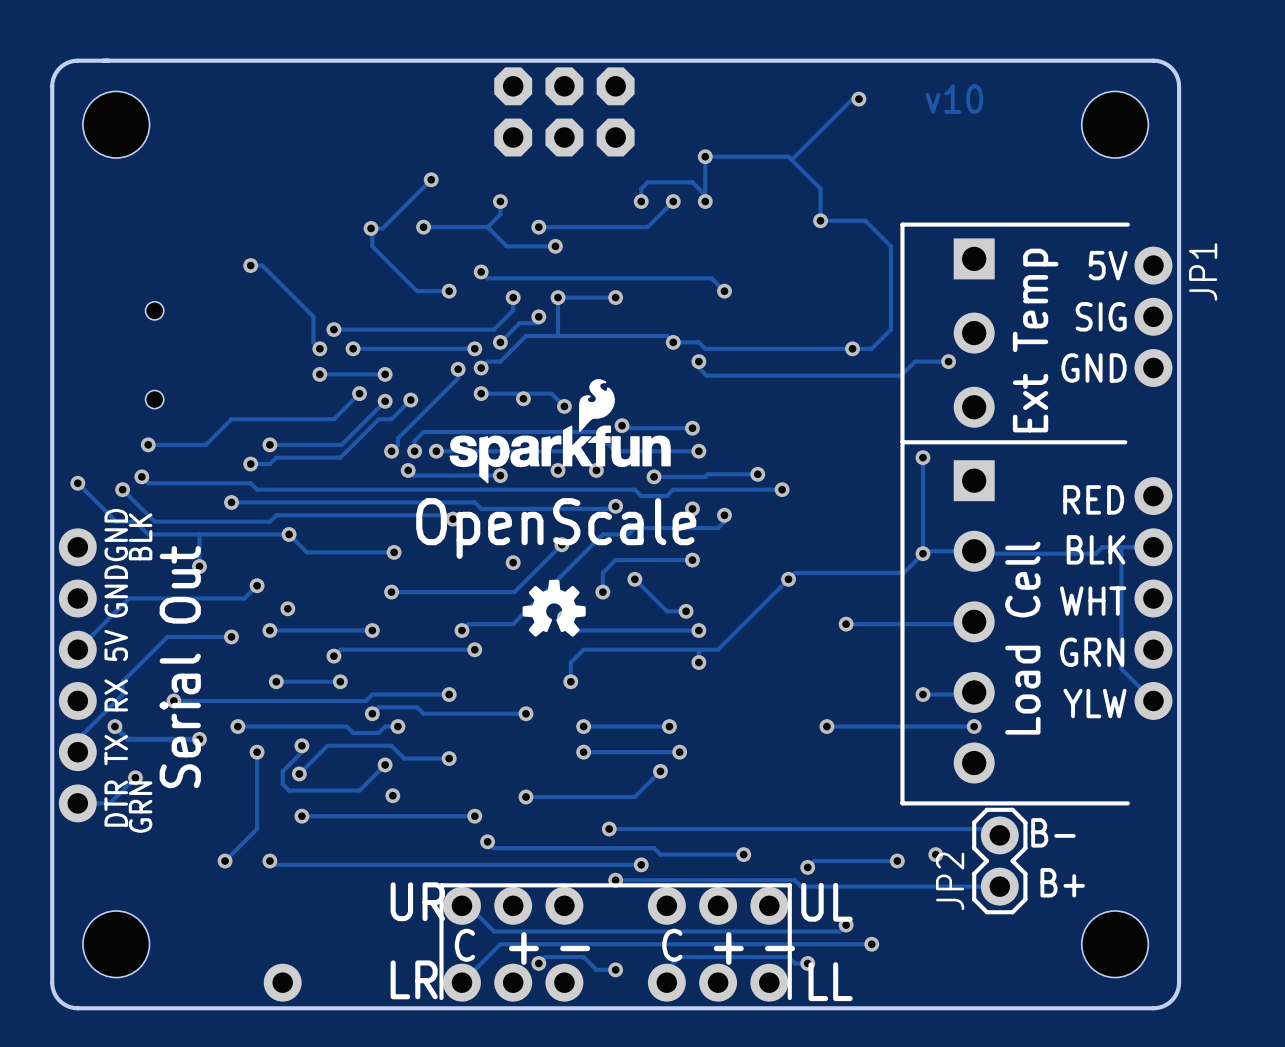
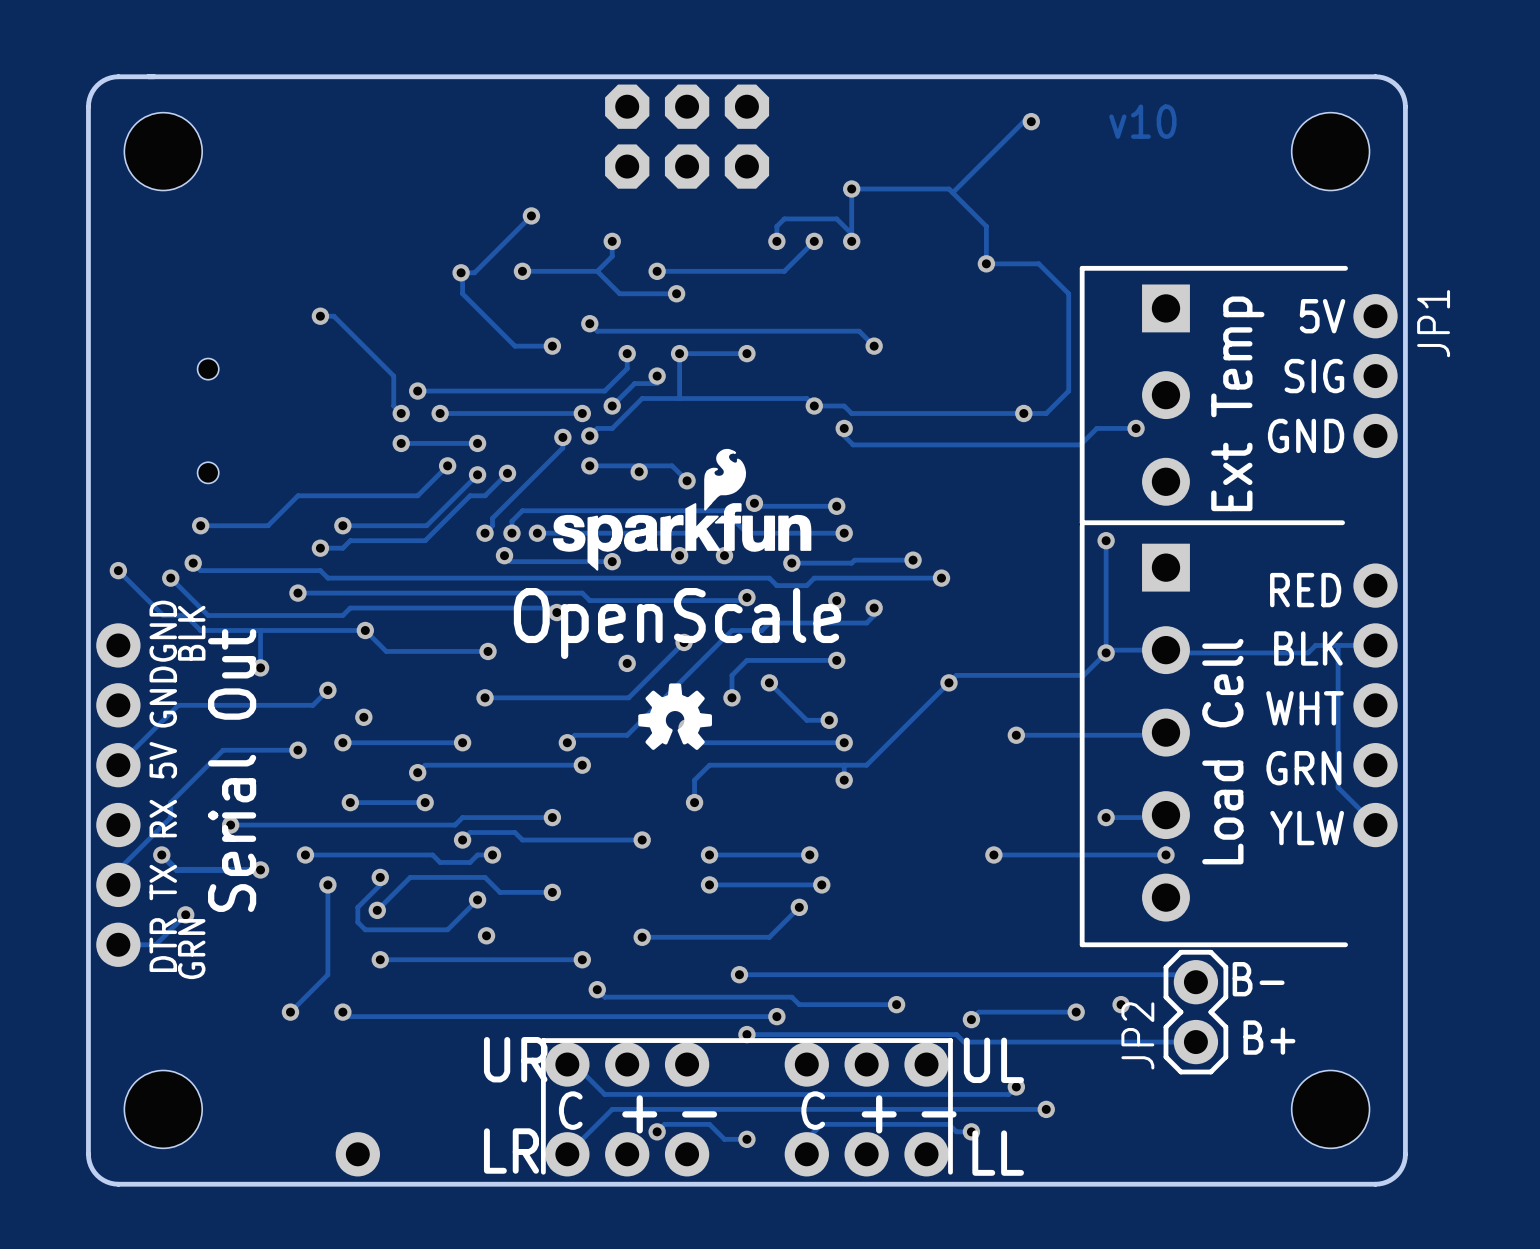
text position: Serial Out (180, 667) -> Serial Out (232, 770)

